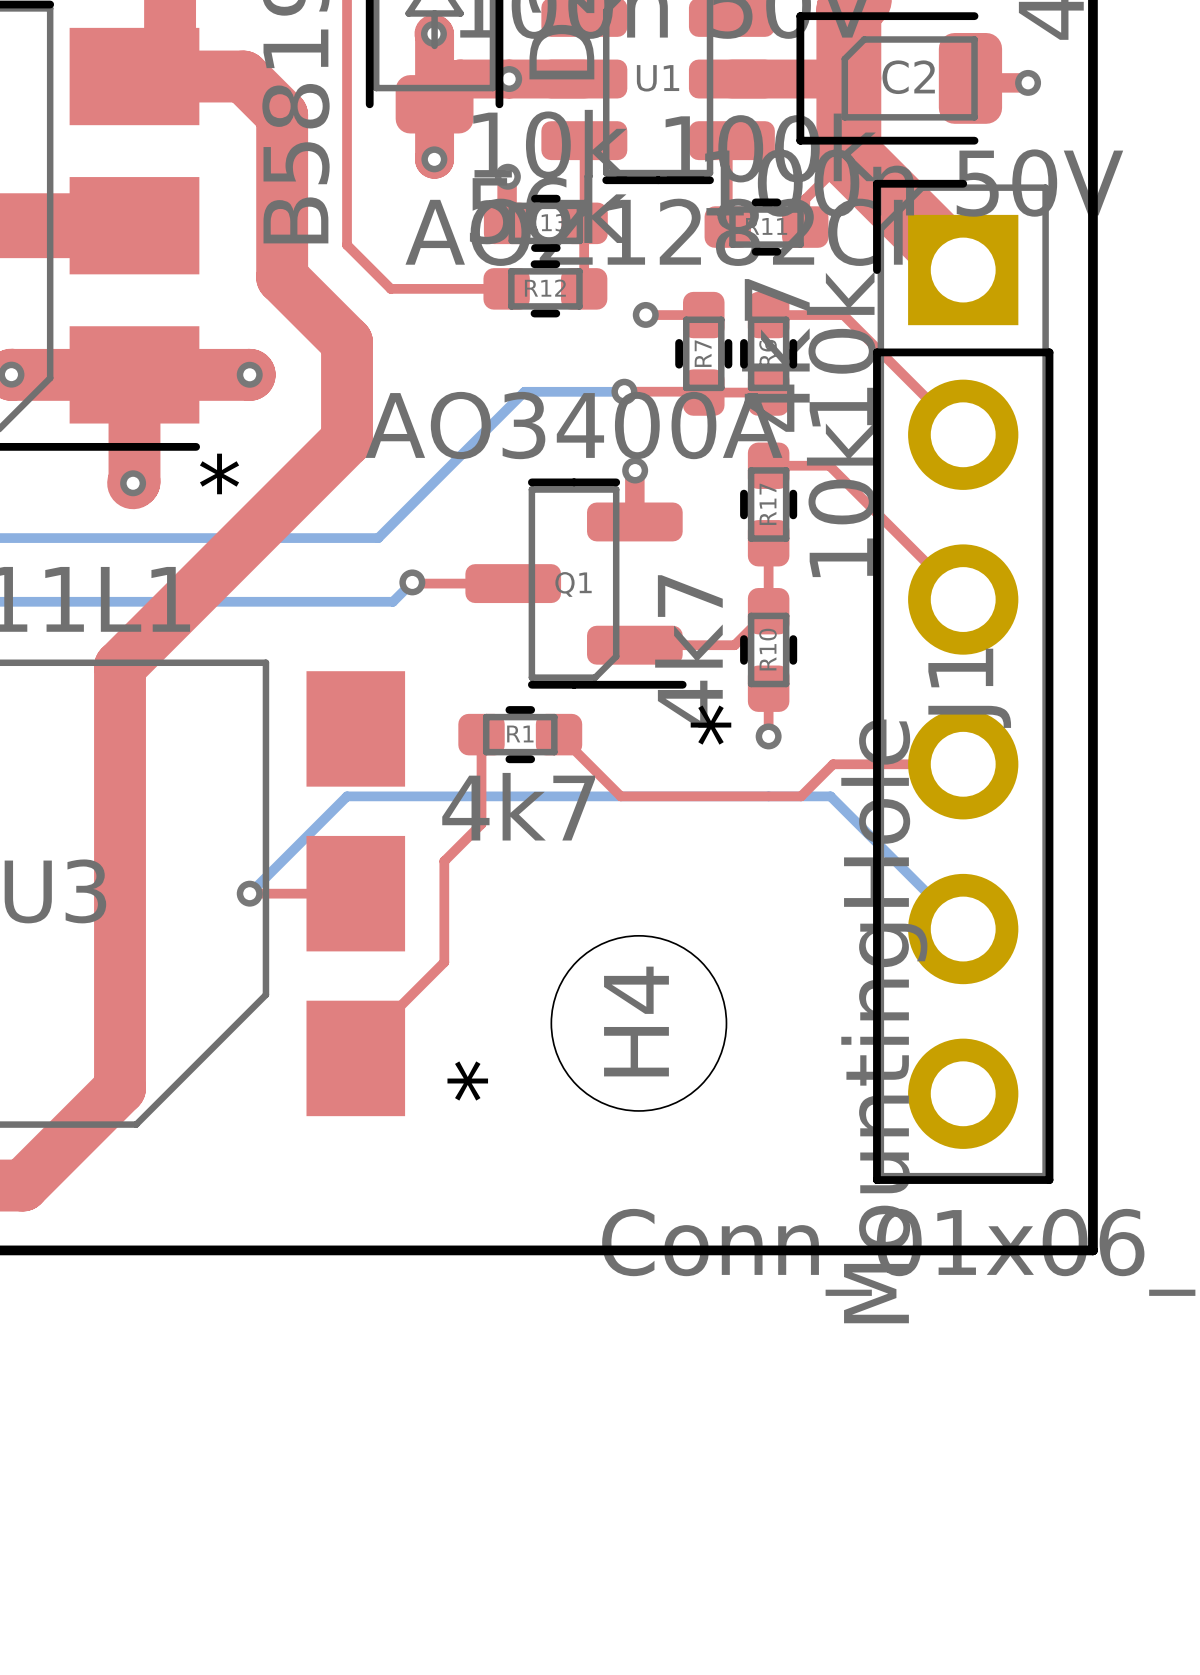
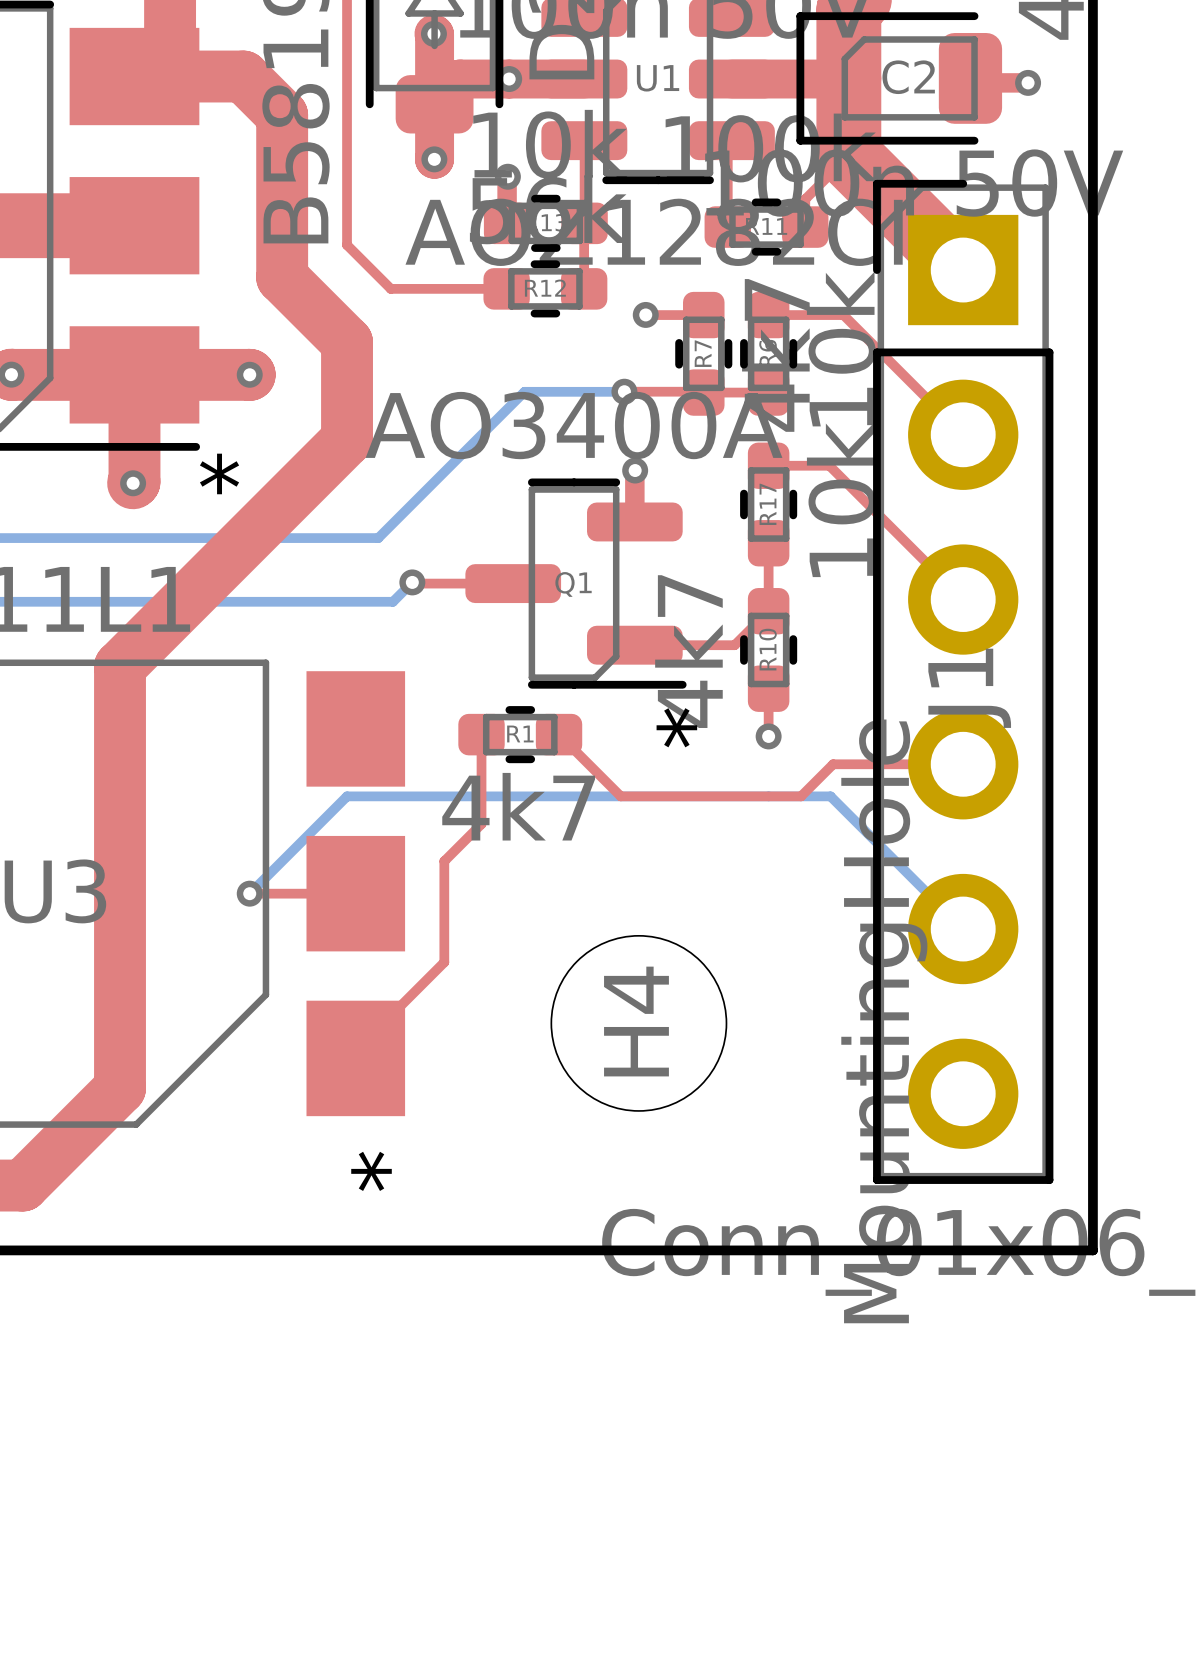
text position: * (710, 725) -> * (676, 727)
text position: * (467, 1081) -> * (371, 1171)

